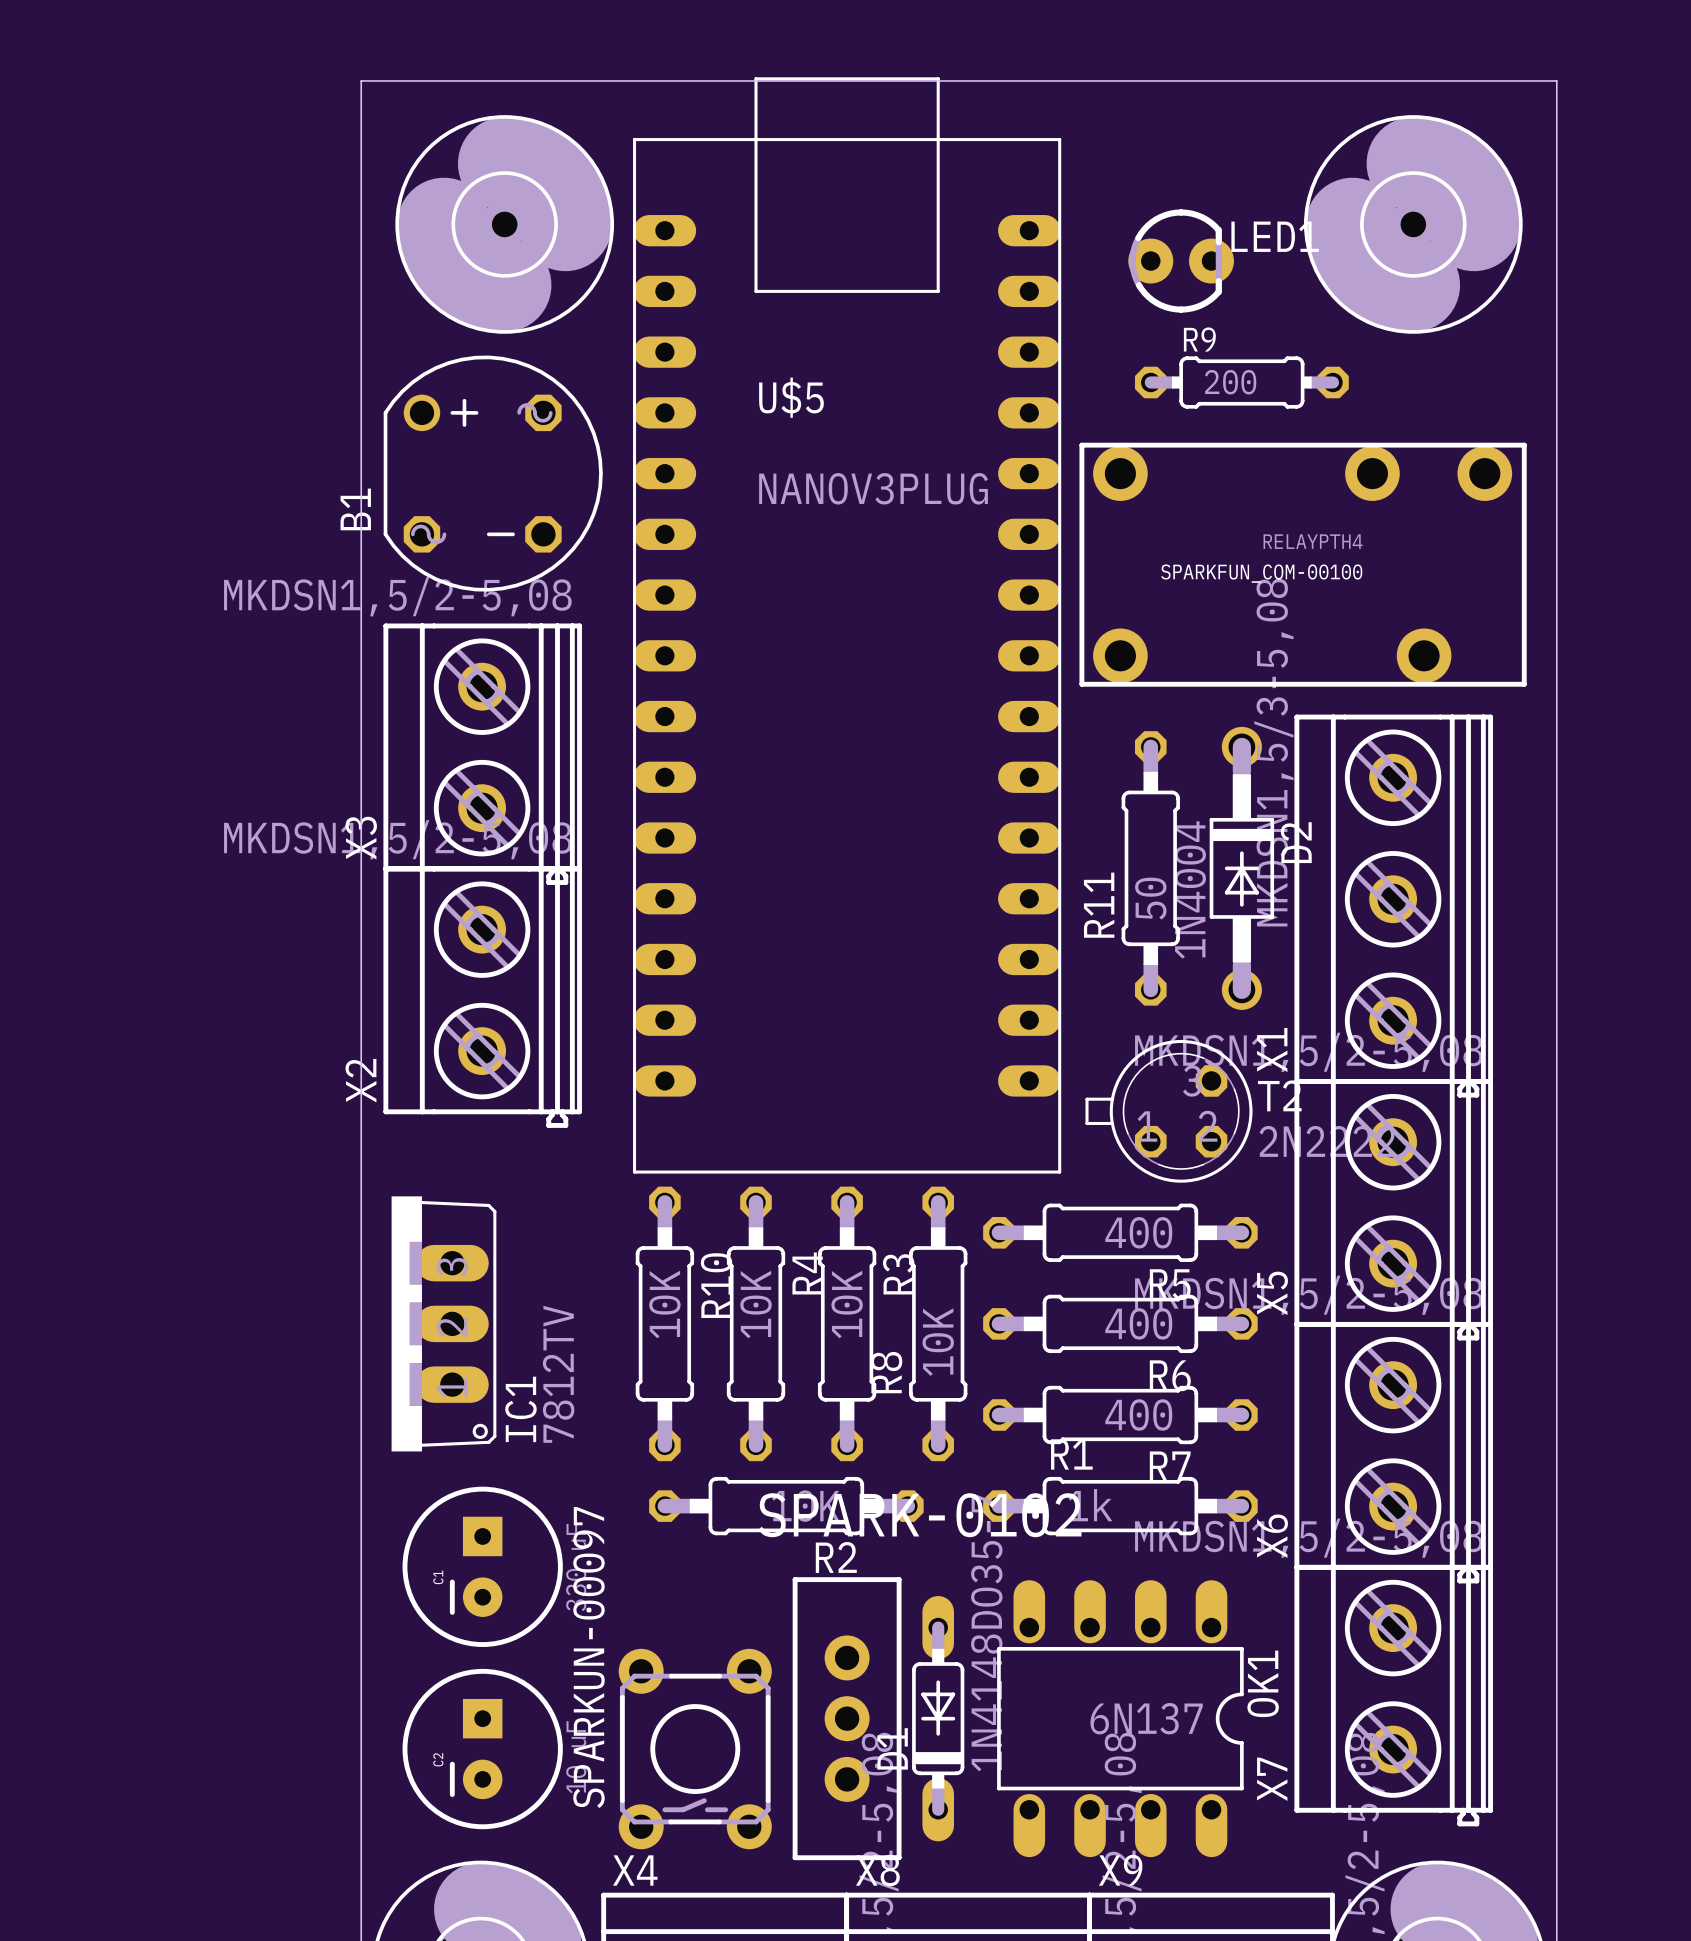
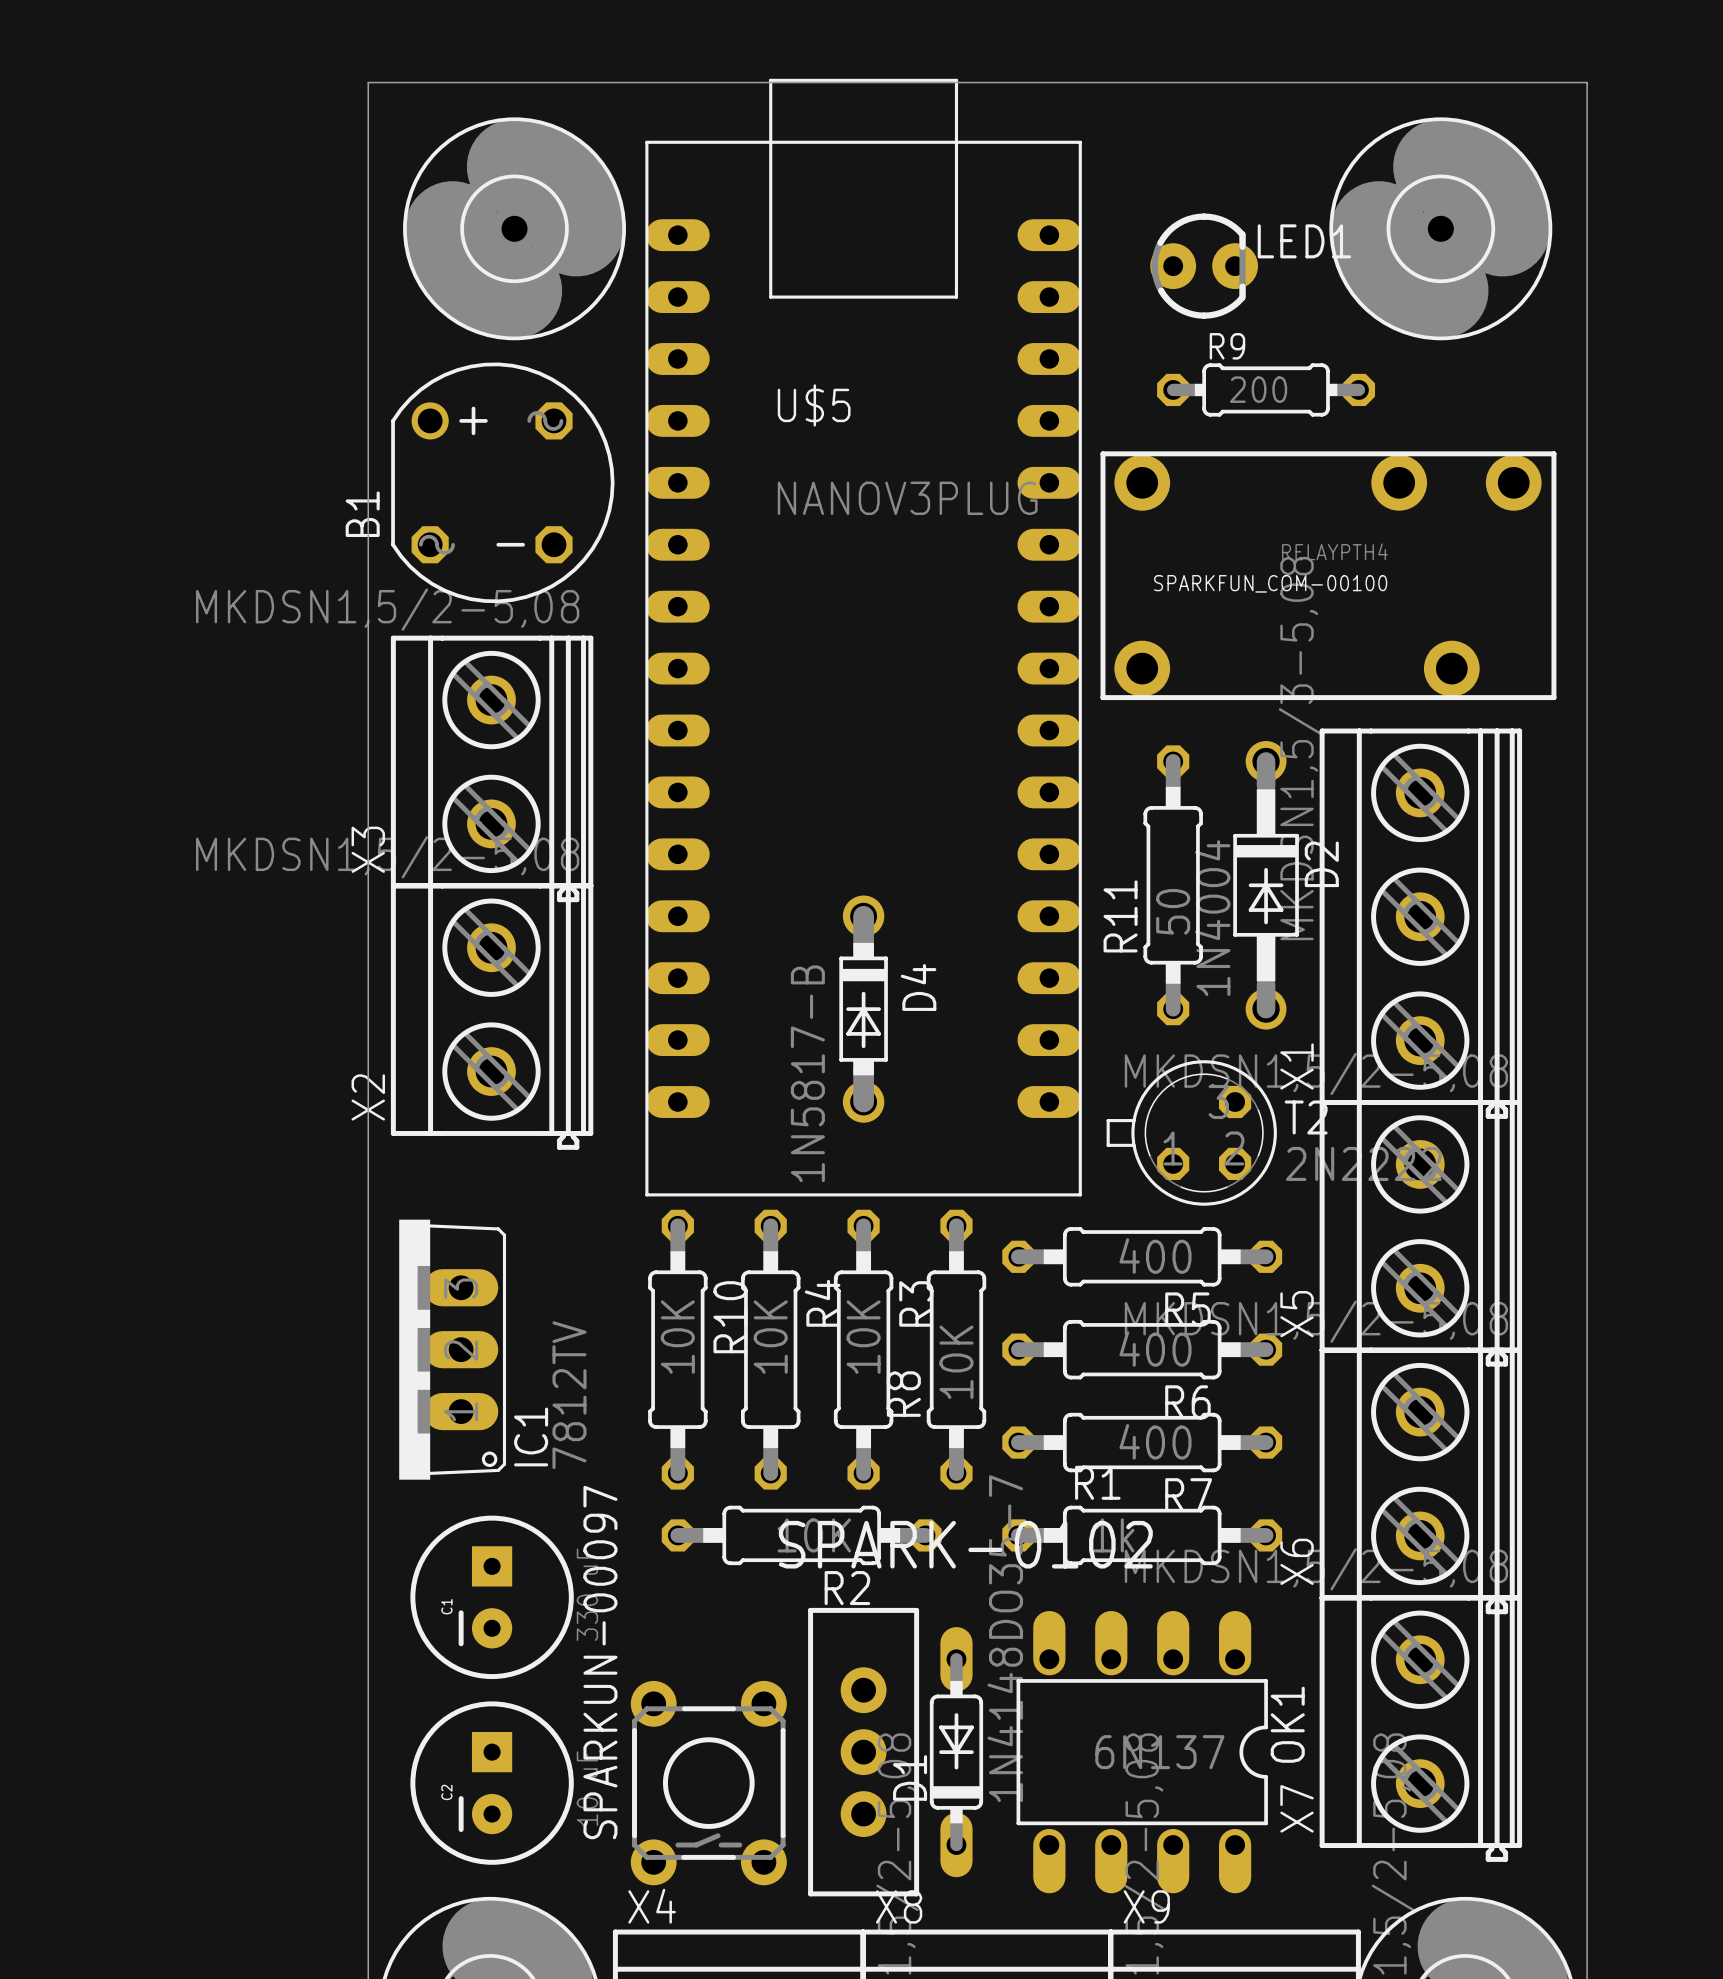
D4: none -> 1N5817-B (863, 1009)

